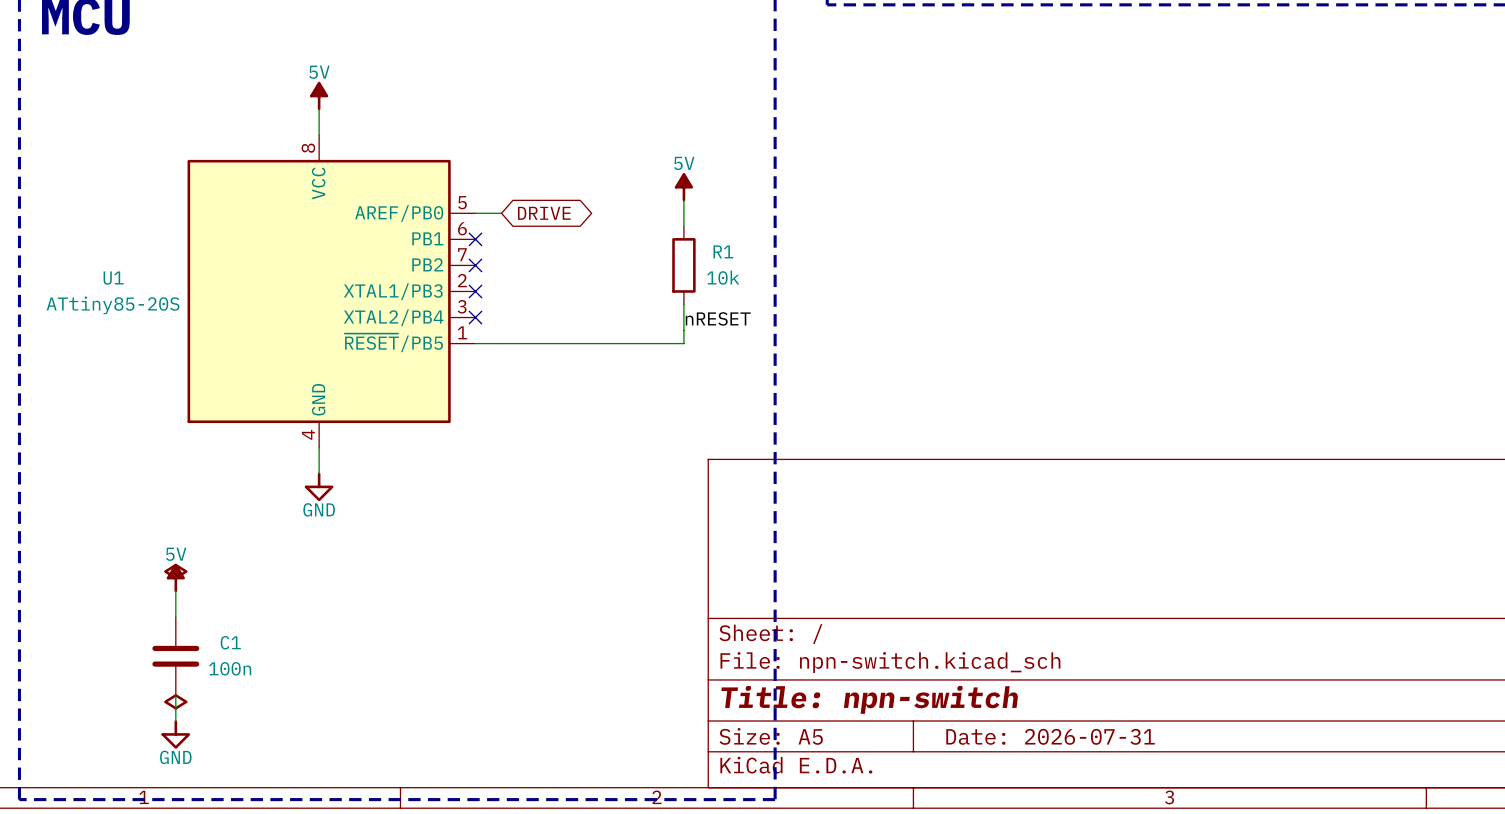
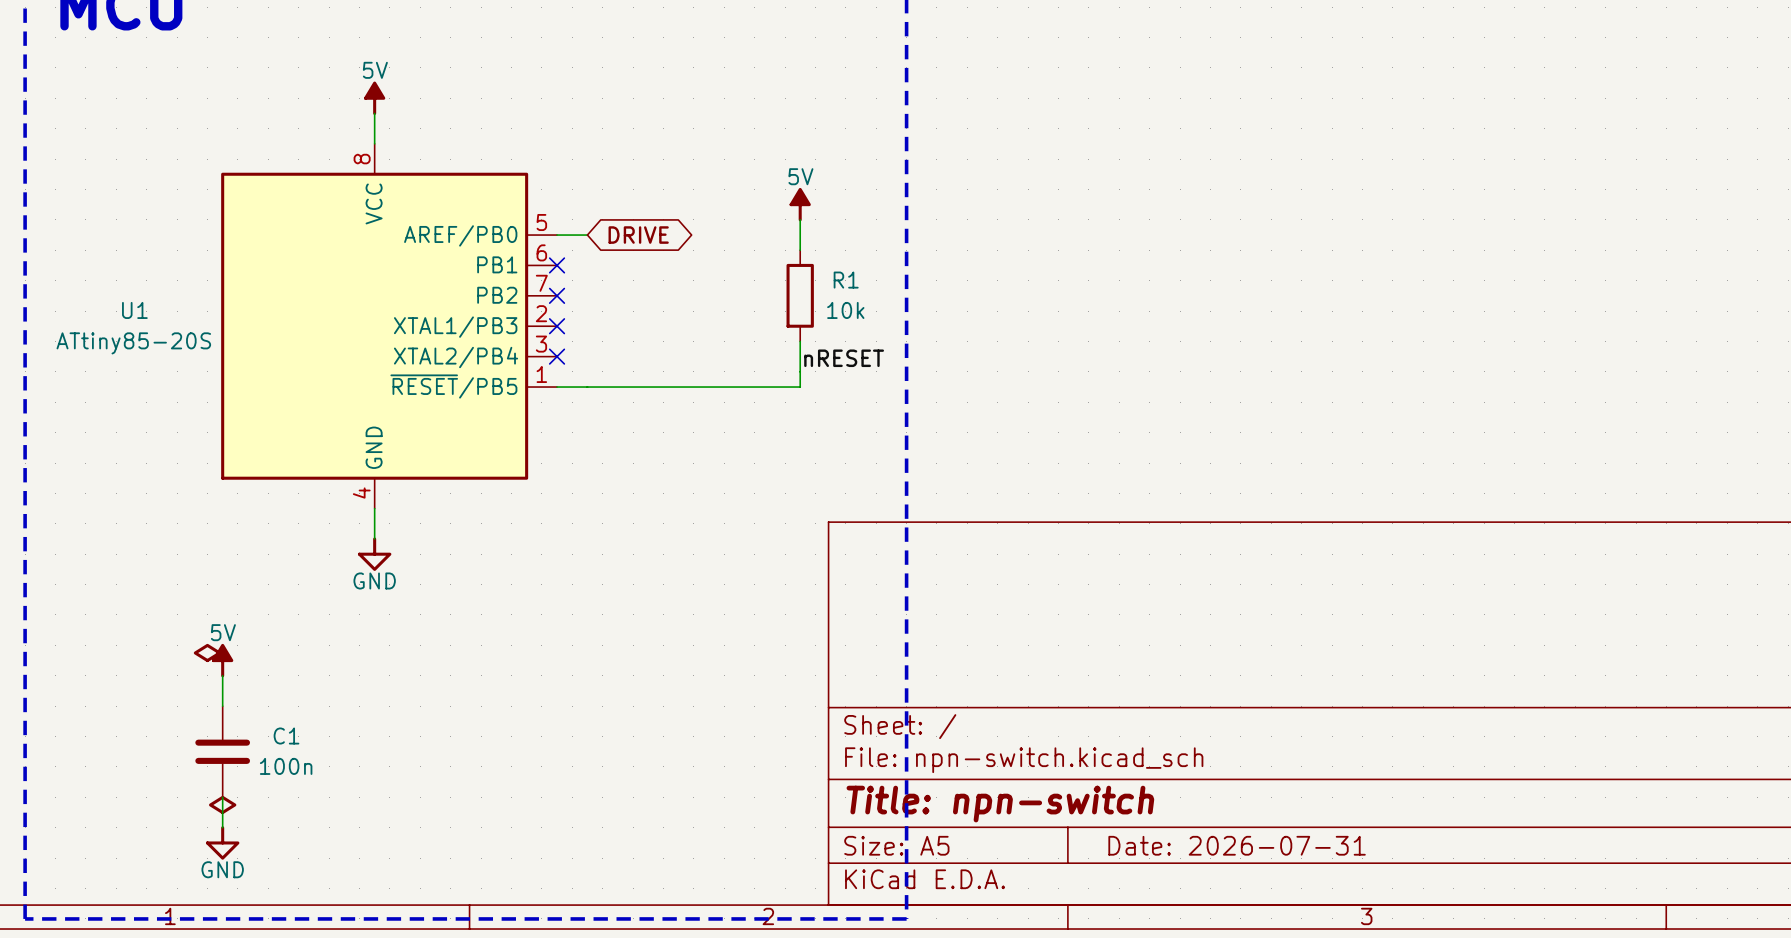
power symbol position: 5V (175, 578) -> 5V (222, 660)
wire: (175, 591) (175, 617) -> (222, 675) (222, 706)
C1 position: (175, 656) -> (222, 751)
wire: (175, 695) (175, 721) -> (222, 797) (222, 827)
power symbol position: (175, 701) -> (222, 804)
power symbol position: GND (175, 734) -> GND (222, 842)

